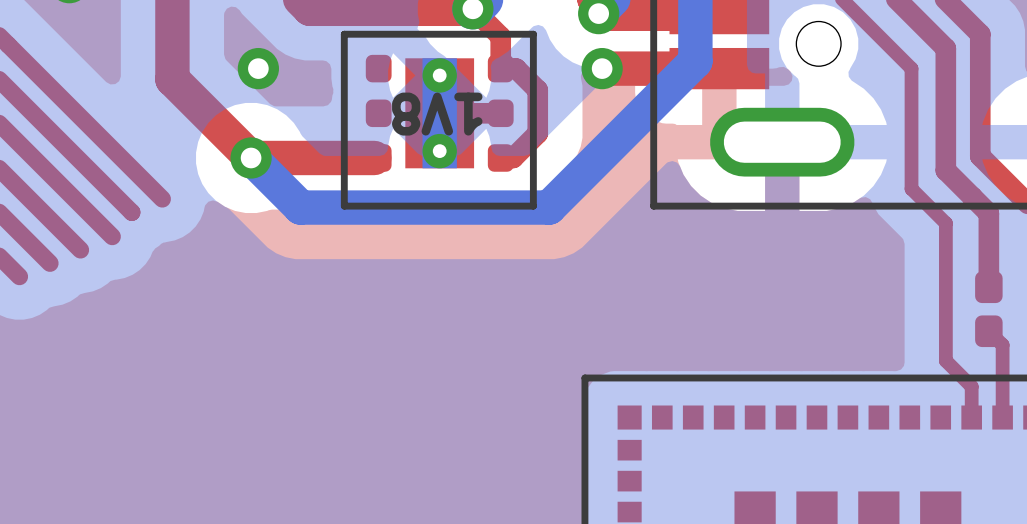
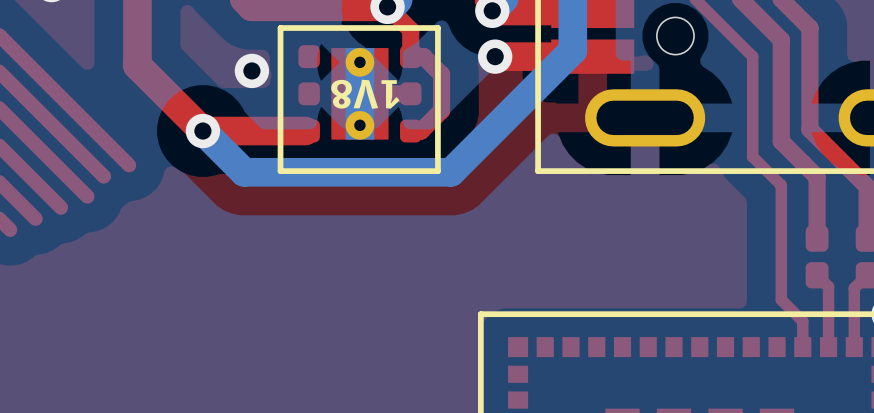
via position: (258, 68) -> (251, 70)

